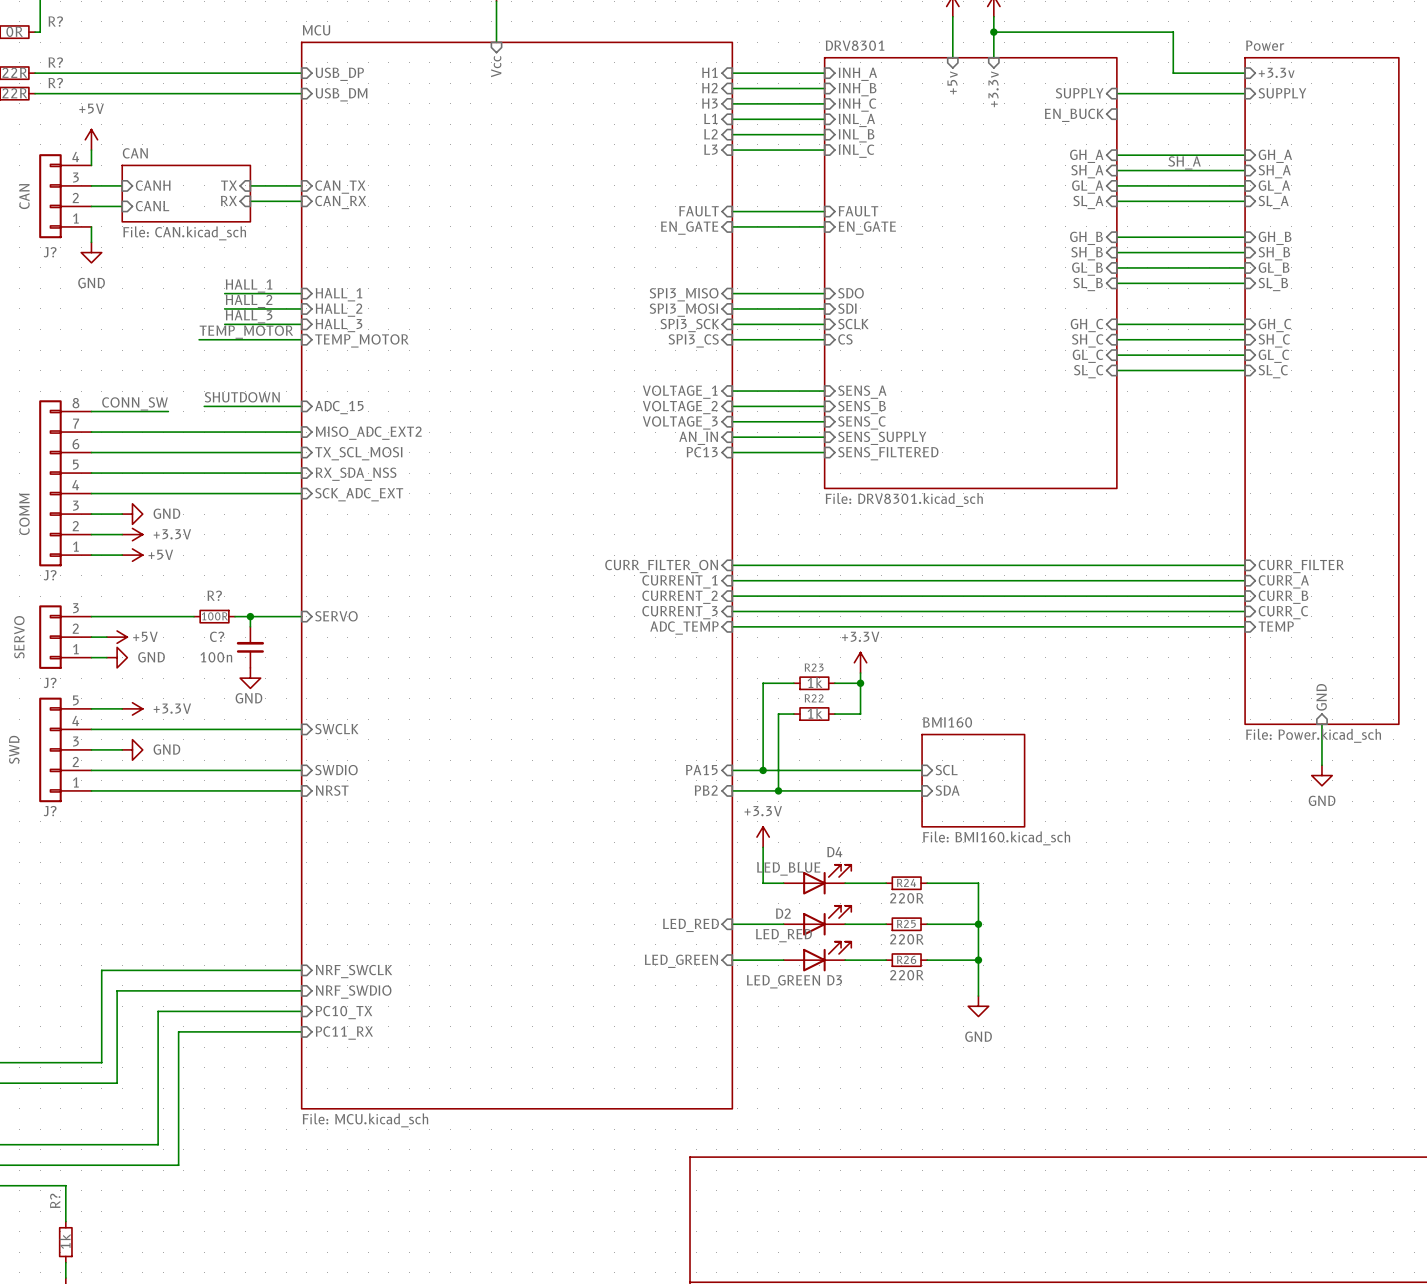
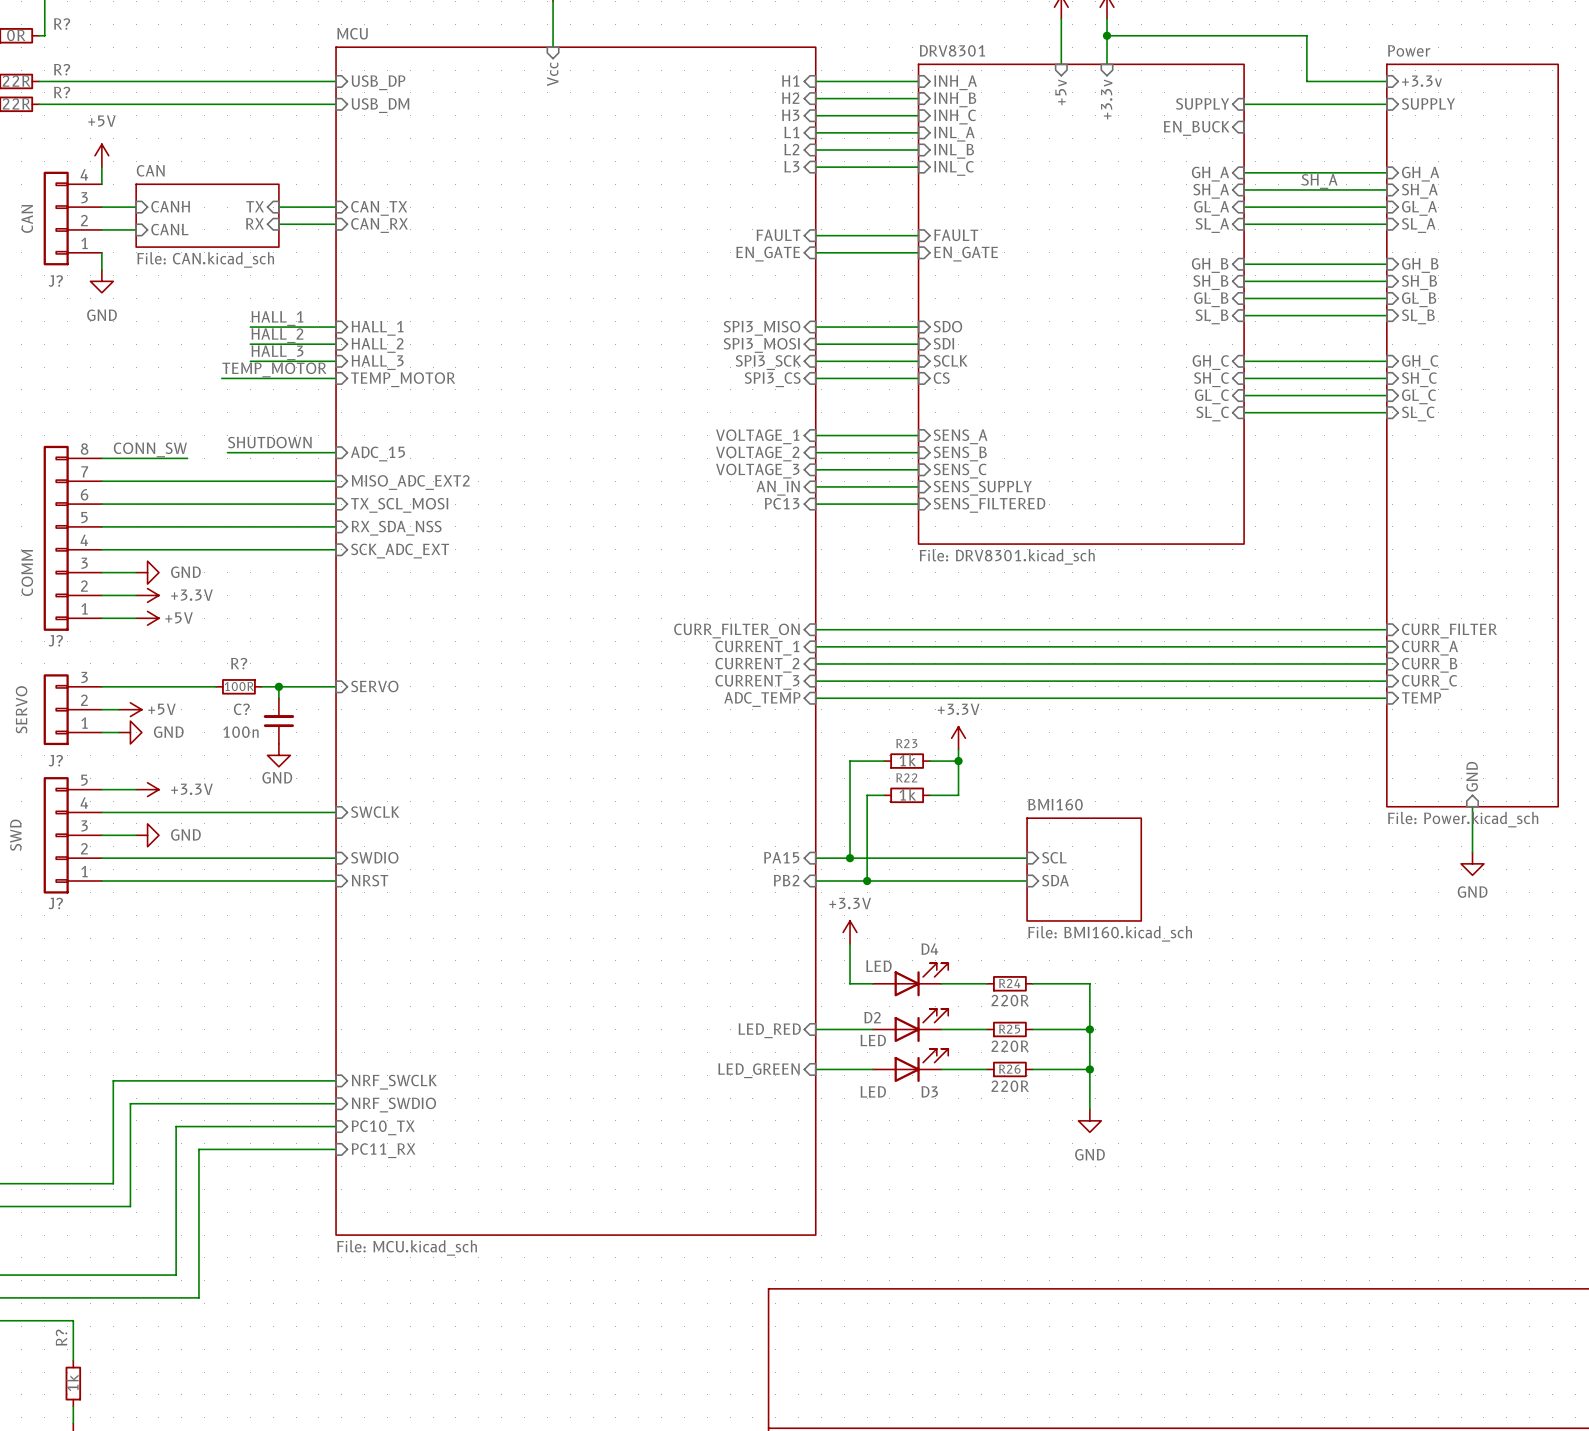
D4 value: LED_BLUE (788, 868) -> LED (878, 966)
D2 value: LED_RED (783, 935) -> LED (873, 1040)
D3 value: LED_GREEN (783, 981) -> LED (873, 1091)

